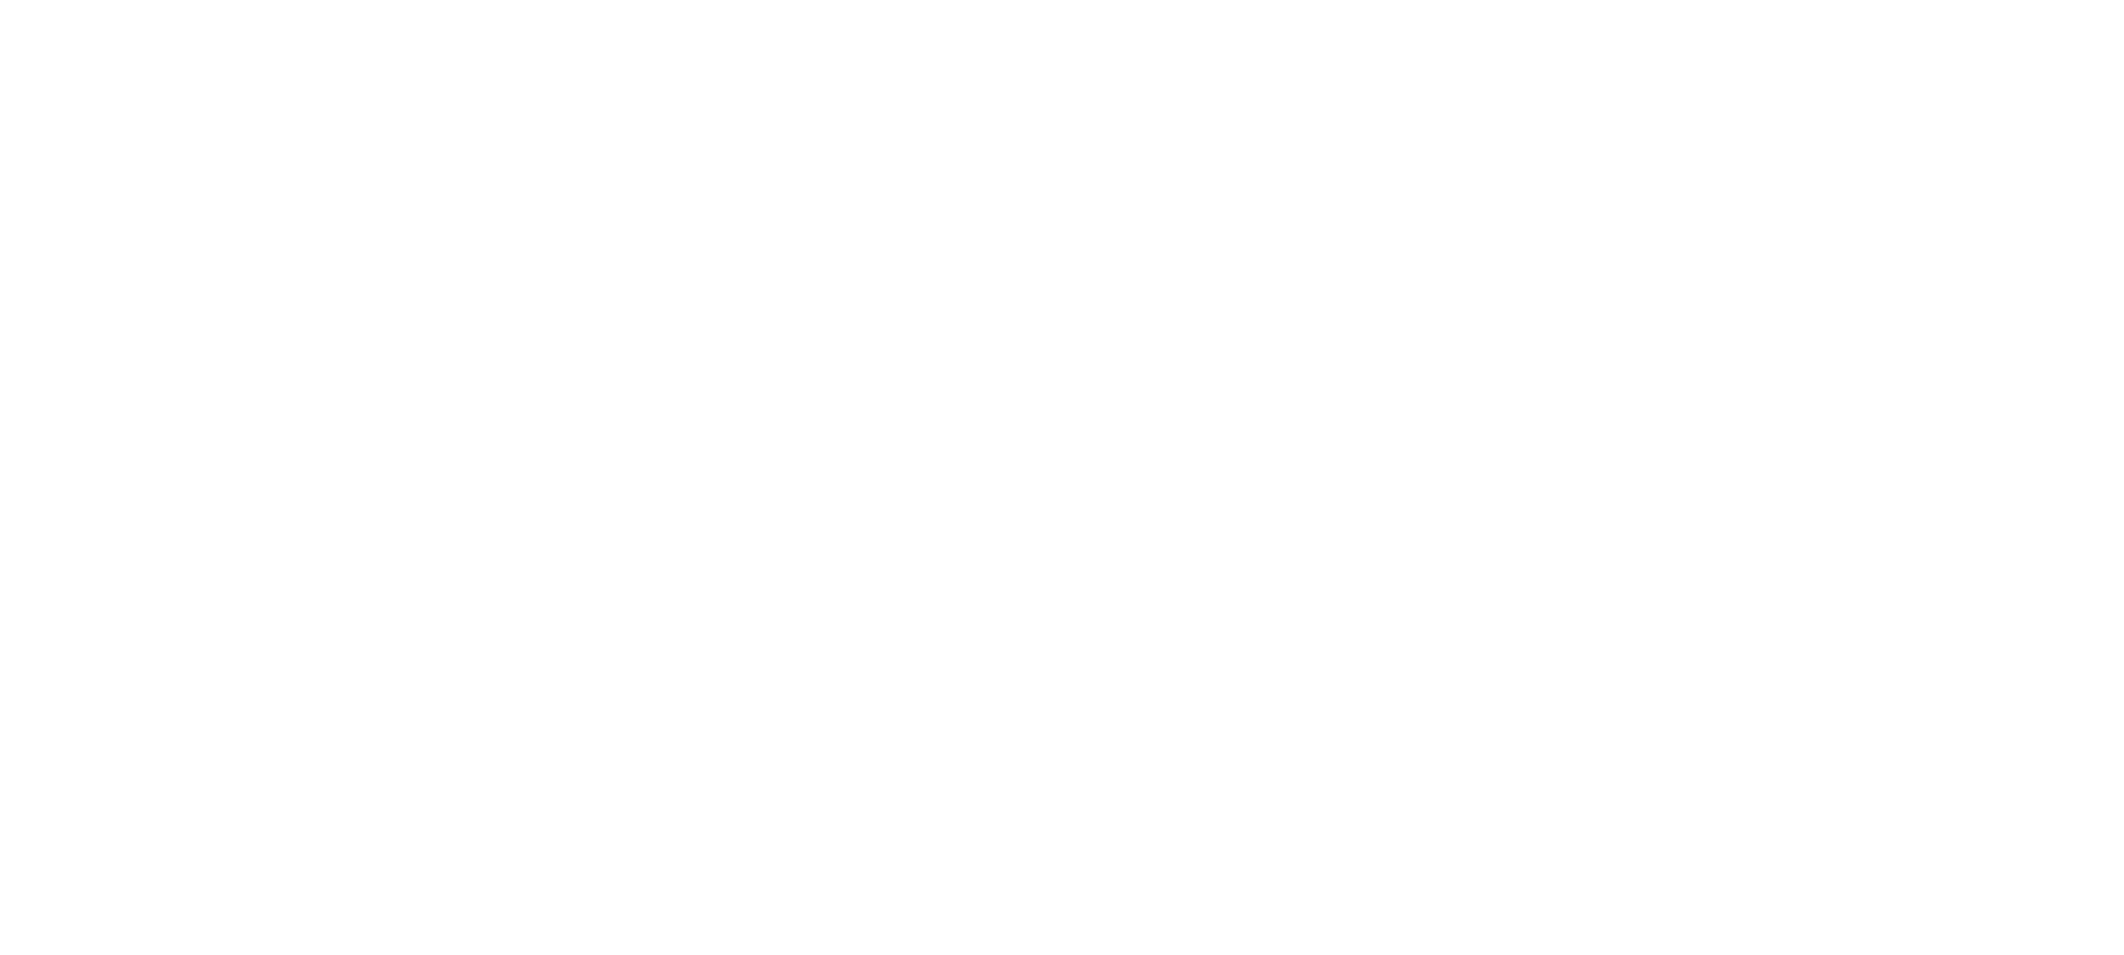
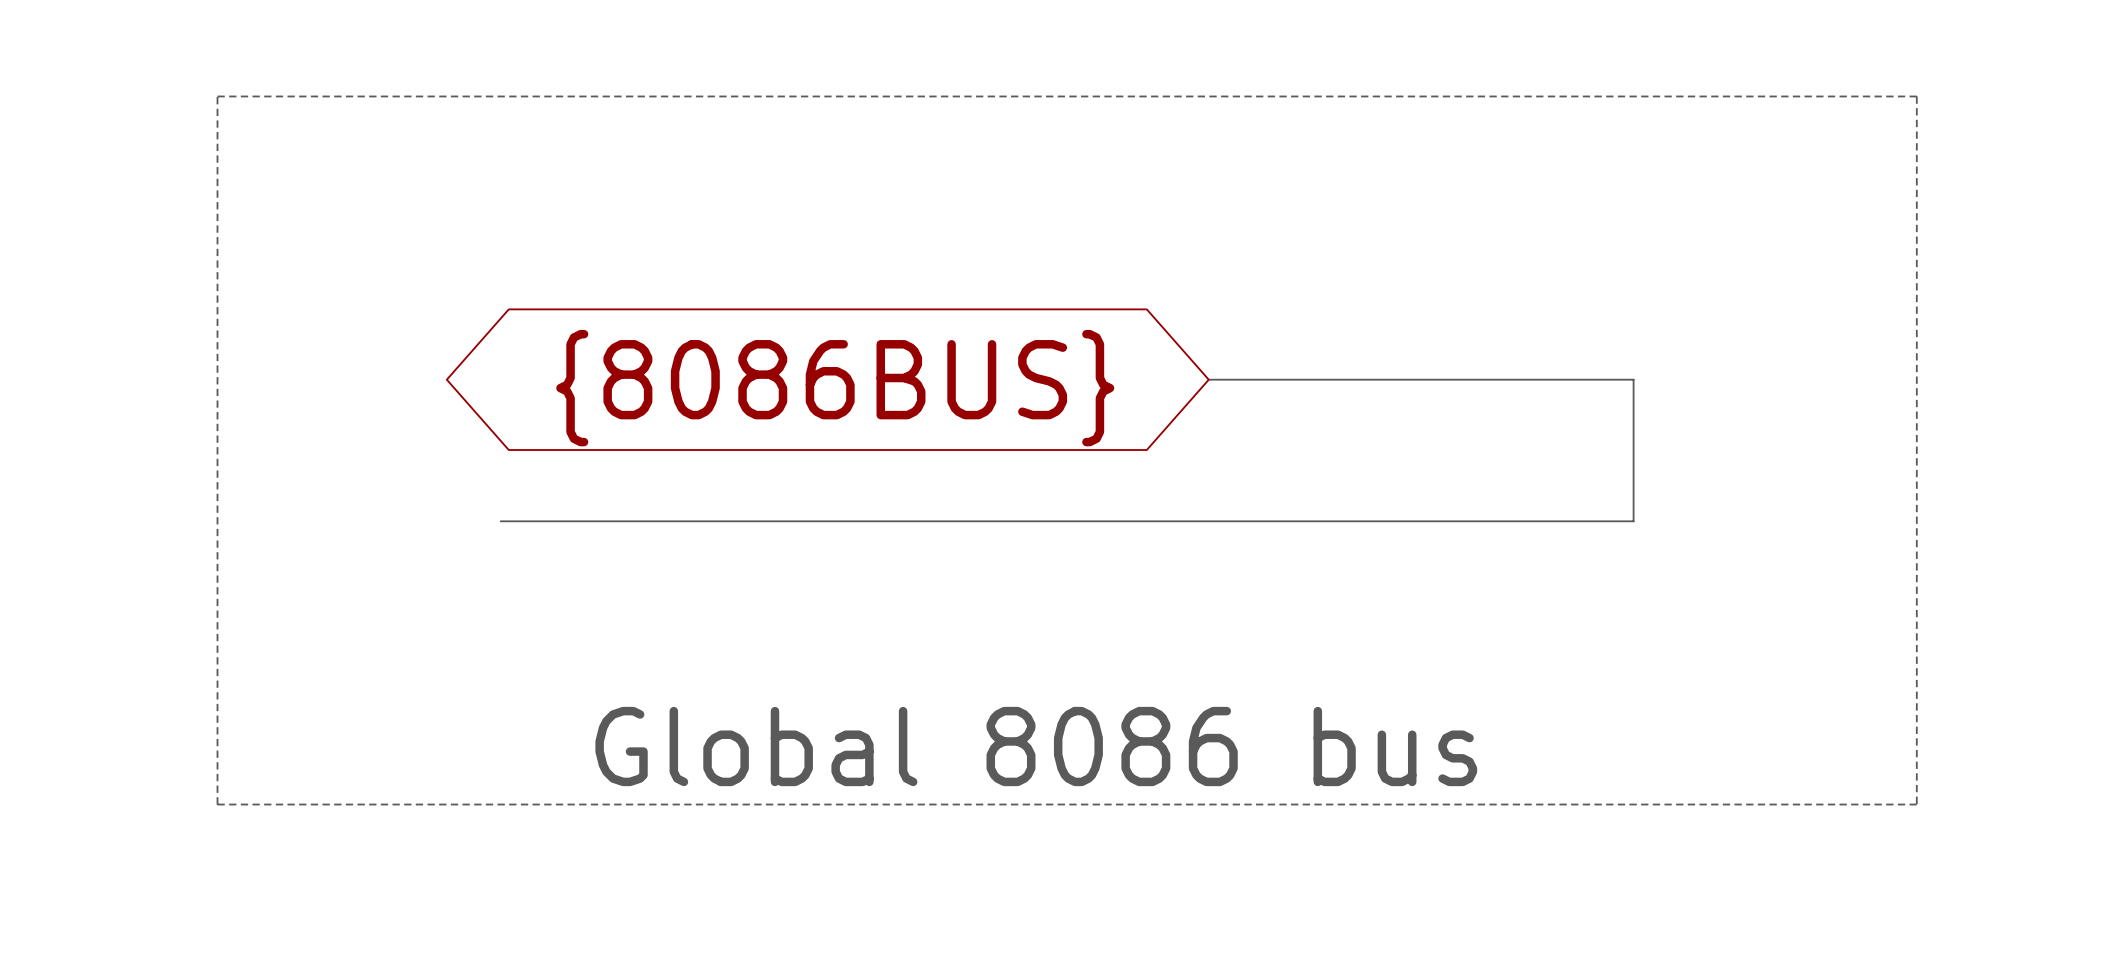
line: none -> (217, 96) (1916, 96) (1916, 804) (217, 804) (217, 96)
bus: none -> (1208, 379) (1633, 379) (1633, 521) (500, 521)
global label: none -> {8086BUS} (835, 388)
text: none -> Global 8086 bus (1036, 746)

